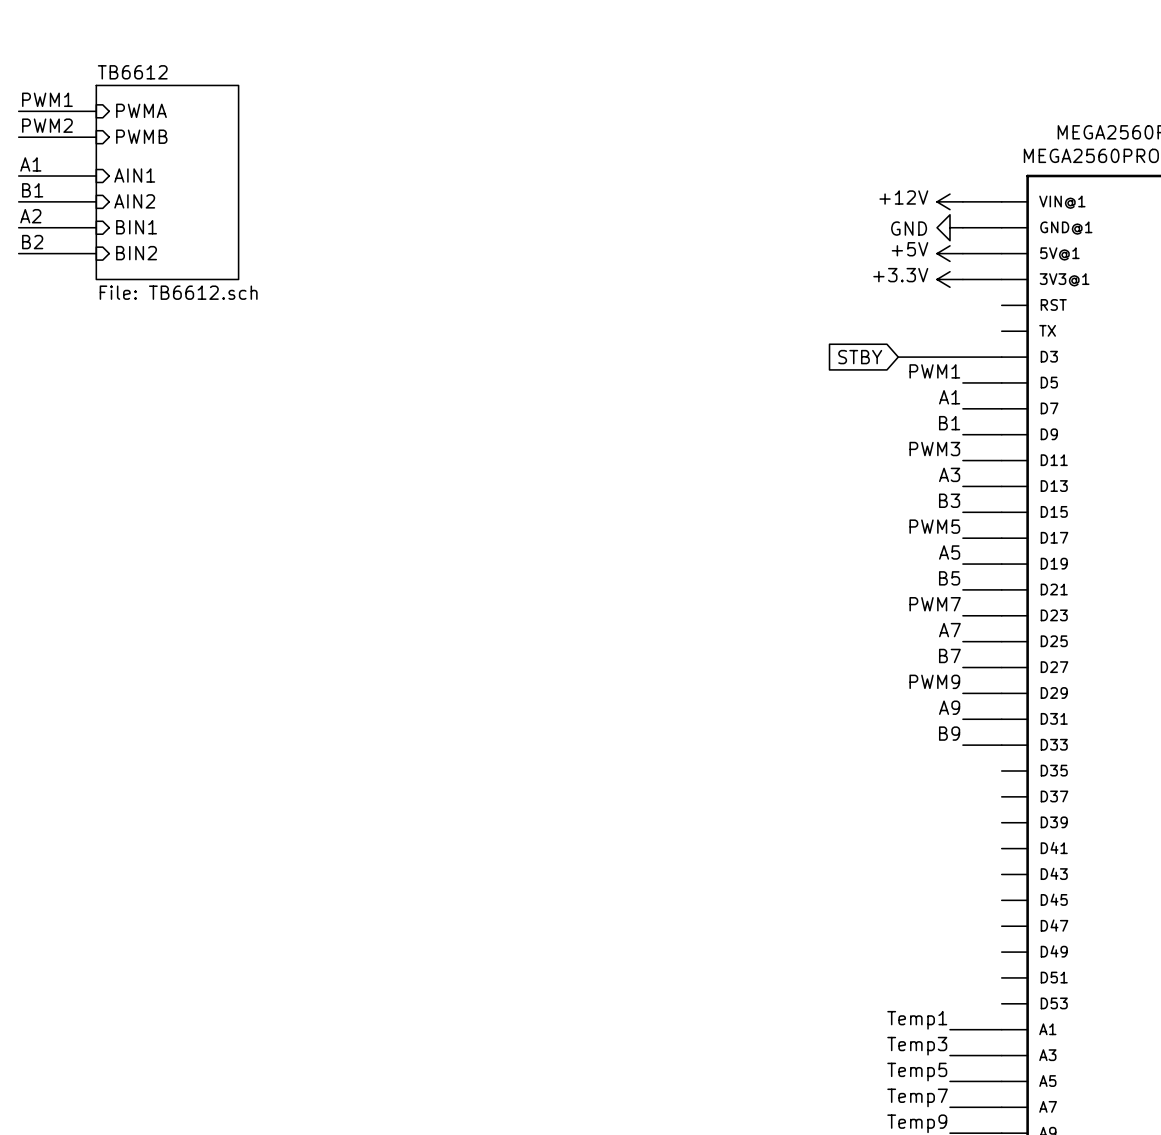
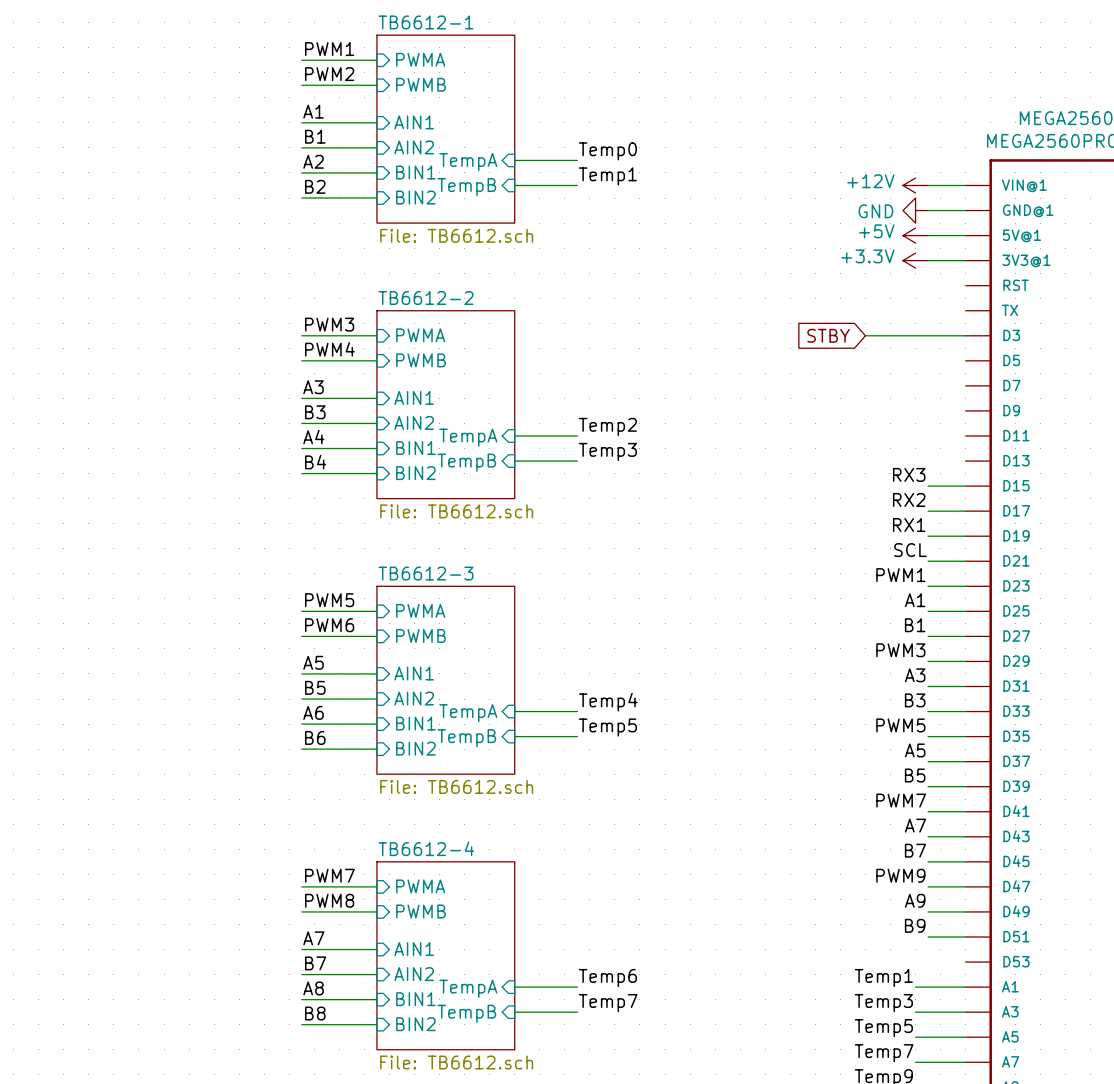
label: none -> PWM1 (329, 49)
wire: none -> (301, 60) (376, 60)
sheet pin: none -> PWMA (420, 59)
label: none -> PWM2 (329, 74)
sheet pin: none -> PWMB (420, 84)
wire: none -> (301, 85) (376, 85)
label: PWM1 (47, 99) -> none
sheet pin: PWMA (141, 110) -> none
wire: (18, 111) (96, 111) -> none
label: PWM2 (47, 125) -> none
label: none -> A1 (313, 111)
sheet pin: PWMB (141, 136) -> none
sheet pin: none -> AIN1 (414, 122)
wire: (18, 137) (96, 137) -> none
wire: none -> (301, 122) (376, 122)
sheet TB6612-1: none -> File: TB6612.sch (445, 129)
label: none -> B1 (315, 136)
sheet pin: none -> AIN2 (414, 147)
wire: none -> (301, 147) (376, 147)
label: A1 (30, 164) -> none
label: none -> Temp0 (607, 151)
sheet pin: AIN1 (134, 175) -> none
wire: (18, 176) (96, 176) -> none
wire: none -> (514, 160) (577, 160)
label: none -> A2 (313, 161)
sheet pin: none -> TempA (468, 162)
sheet TB6612: File: TB6612.sch (167, 182) -> none
wire: none -> (301, 172) (376, 172)
sheet pin: none -> BIN1 (415, 172)
label: B1 (32, 190) -> none
label: none -> Temp1 (607, 176)
wire: (18, 201) (96, 201) -> none
sheet pin: AIN2 (134, 201) -> none
wire: none -> (514, 185) (577, 185)
label: none -> B2 (315, 186)
sheet pin: none -> TempB (466, 187)
wire: none -> (301, 198) (376, 198)
sheet pin: none -> BIN2 (415, 197)
label: A2 (30, 216) -> none
wire: (18, 227) (96, 227) -> none
sheet pin: BIN1 (136, 227) -> none
label: B2 (32, 242) -> none
wire: (18, 253) (96, 253) -> none
sheet pin: BIN2 (136, 253) -> none
label: none -> PWM3 (329, 324)
sheet pin: none -> PWMA (420, 335)
wire: none -> (301, 335) (376, 335)
label: none -> PWM4 (329, 349)
label: PWM1 (934, 371) -> none
wire: none -> (301, 360) (376, 360)
sheet pin: none -> PWMB (420, 360)
wire: (962, 382) (1001, 382) -> none
label: A1 (949, 397) -> none
wire: (962, 408) (1001, 408) -> none
label: none -> A3 (313, 387)
wire: none -> (301, 398) (376, 398)
sheet pin: none -> AIN1 (414, 397)
label: B1 (949, 423) -> none
sheet TB6612-2: none -> File: TB6612.sch (445, 404)
wire: (962, 434) (1001, 434) -> none
label: none -> B3 (315, 412)
wire: none -> (301, 423) (376, 423)
sheet pin: none -> AIN2 (414, 423)
label: PWM3 (934, 449) -> none
label: none -> Temp2 (607, 426)
wire: none -> (514, 435) (577, 435)
wire: (962, 460) (1001, 460) -> none
label: none -> A4 (313, 437)
sheet pin: none -> TempA (468, 437)
wire: none -> (301, 448) (376, 448)
sheet pin: none -> BIN1 (415, 448)
label: A3 (949, 474) -> none
label: none -> Temp3 (607, 451)
wire: none -> (514, 461) (577, 461)
wire: (962, 486) (1001, 486) -> none
label: none -> B4 (315, 462)
sheet pin: none -> TempB (466, 462)
sheet pin: none -> BIN2 (415, 473)
wire: none -> (301, 473) (376, 473)
label: B3 (949, 500) -> RX3 (909, 474)
label: PWM5 (934, 526) -> RX2 (909, 499)
label: A5 (949, 552) -> RX1 (909, 525)
label: B5 (949, 578) -> SCL (910, 550)
label: PWM7 (935, 604) -> PWM1 (900, 575)
label: none -> PWM5 (329, 600)
label: A7 (949, 630) -> A1 (915, 600)
wire: none -> (301, 611) (376, 611)
sheet pin: none -> PWMA (420, 610)
label: none -> PWM6 (329, 625)
label: B7 (949, 655) -> B1 (915, 625)
wire: none -> (301, 636) (376, 636)
sheet pin: none -> PWMB (420, 635)
label: PWM9 (934, 681) -> PWM3 (900, 650)
label: none -> A5 (313, 662)
sheet pin: none -> AIN1 (414, 673)
wire: none -> (301, 673) (376, 673)
label: A9 (949, 707) -> A3 (915, 675)
sheet TB6612-3: none -> File: TB6612.sch (445, 680)
label: none -> B5 (315, 687)
sheet pin: none -> AIN2 (414, 698)
wire: none -> (301, 699) (376, 699)
label: B9 (949, 733) -> B3 (915, 700)
label: none -> Temp4 (608, 702)
wire: none -> (514, 711) (577, 711)
label: none -> A6 (313, 712)
sheet pin: none -> TempA (468, 713)
sheet pin: none -> BIN1 (415, 723)
wire: none -> (301, 724) (376, 724)
label: none -> PWM5 (900, 725)
label: none -> Temp5 (607, 727)
wire: none -> (514, 736) (577, 736)
wire: none -> (928, 736) (965, 736)
label: none -> B6 (315, 737)
sheet pin: none -> TempB (466, 738)
wire: none -> (301, 749) (376, 749)
sheet pin: none -> BIN2 (415, 748)
label: none -> A5 (915, 750)
wire: none -> (928, 761) (965, 761)
label: none -> B5 (915, 775)
wire: none -> (928, 786) (965, 786)
label: none -> PWM7 (901, 800)
wire: none -> (928, 811) (965, 811)
label: none -> A7 (915, 825)
wire: none -> (928, 836) (965, 836)
label: none -> B7 (915, 850)
wire: none -> (928, 861) (965, 861)
label: none -> PWM7 (329, 875)
label: none -> PWM9 (900, 875)
sheet pin: none -> PWMA (420, 886)
wire: none -> (301, 886) (376, 886)
wire: none -> (928, 886) (965, 886)
label: none -> PWM8 (329, 900)
label: none -> A9 (915, 900)
sheet pin: none -> PWMB (420, 911)
wire: none -> (301, 911) (376, 911)
wire: none -> (928, 911) (965, 911)
label: none -> B9 (915, 925)
wire: none -> (928, 937) (965, 937)
label: none -> A7 (313, 938)
wire: none -> (301, 949) (376, 949)
sheet pin: none -> AIN1 (414, 949)
sheet TB6612-4: none -> File: TB6612.sch (445, 955)
label: none -> B7 (315, 963)
wire: none -> (301, 974) (376, 974)
sheet pin: none -> AIN2 (414, 974)
label: none -> Temp6 (607, 978)
wire: none -> (514, 987) (577, 987)
label: none -> A8 (313, 988)
sheet pin: none -> TempA (468, 988)
wire: none -> (301, 999) (376, 999)
sheet pin: none -> BIN1 (415, 999)
label: none -> Temp7 (608, 1003)
wire: none -> (514, 1012) (577, 1012)
label: none -> B8 (315, 1013)
sheet pin: none -> TempB (466, 1013)
wire: none -> (301, 1024) (376, 1024)
sheet pin: none -> BIN2 (415, 1024)

